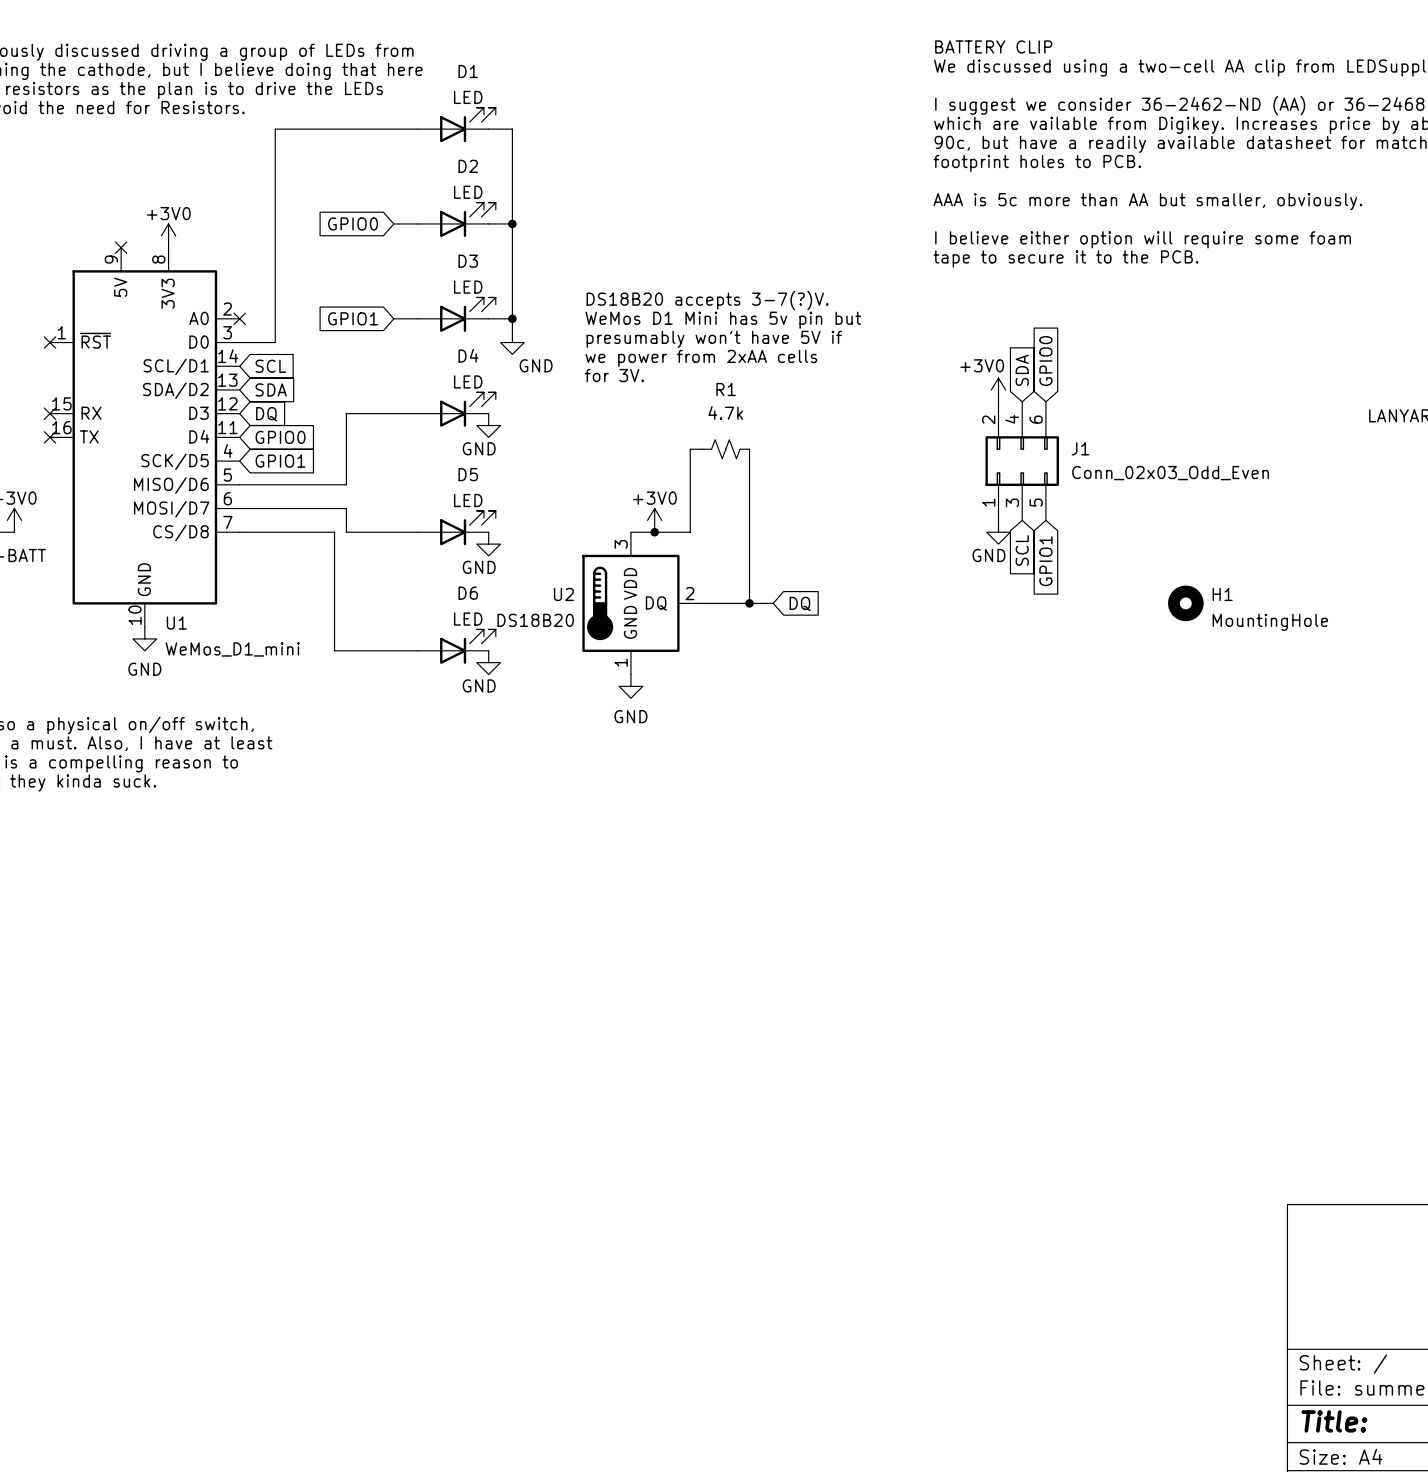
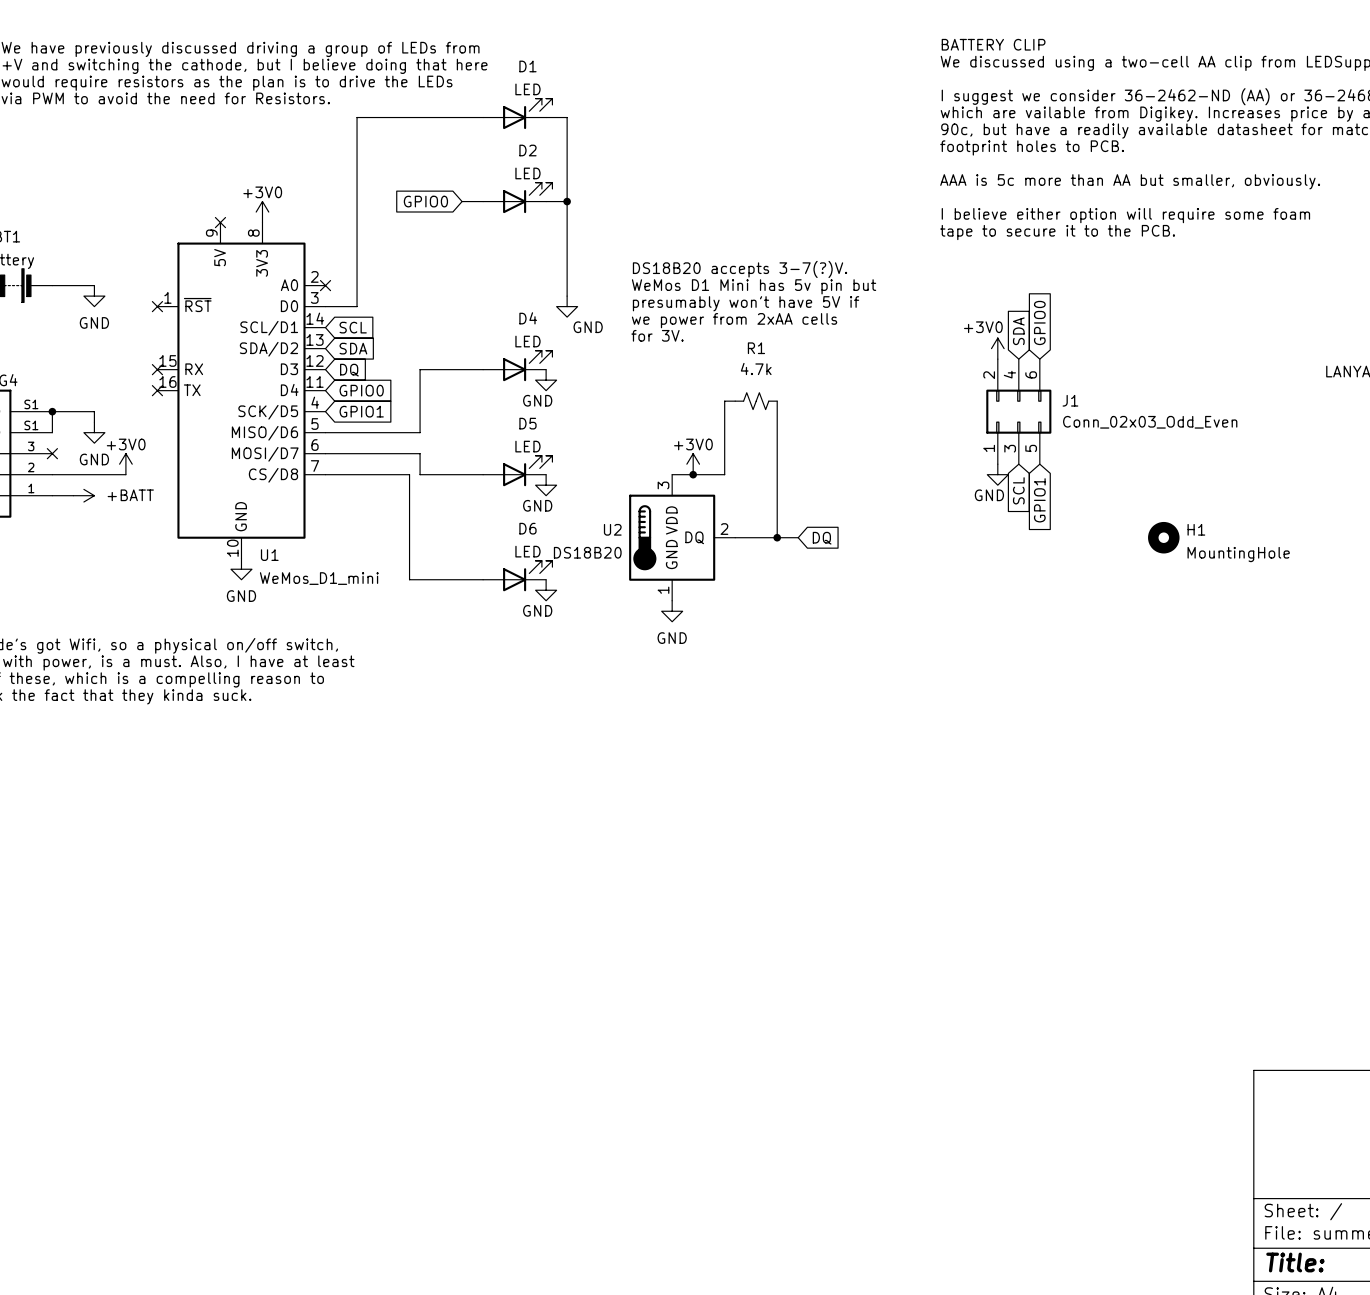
D3: LED (456, 314) -> none
global label: GPIO1 (353, 318) -> none
wire: (393, 318) (417, 318) -> none
wire: (488, 318) (512, 318) -> none
junction: (512, 318) -> none

